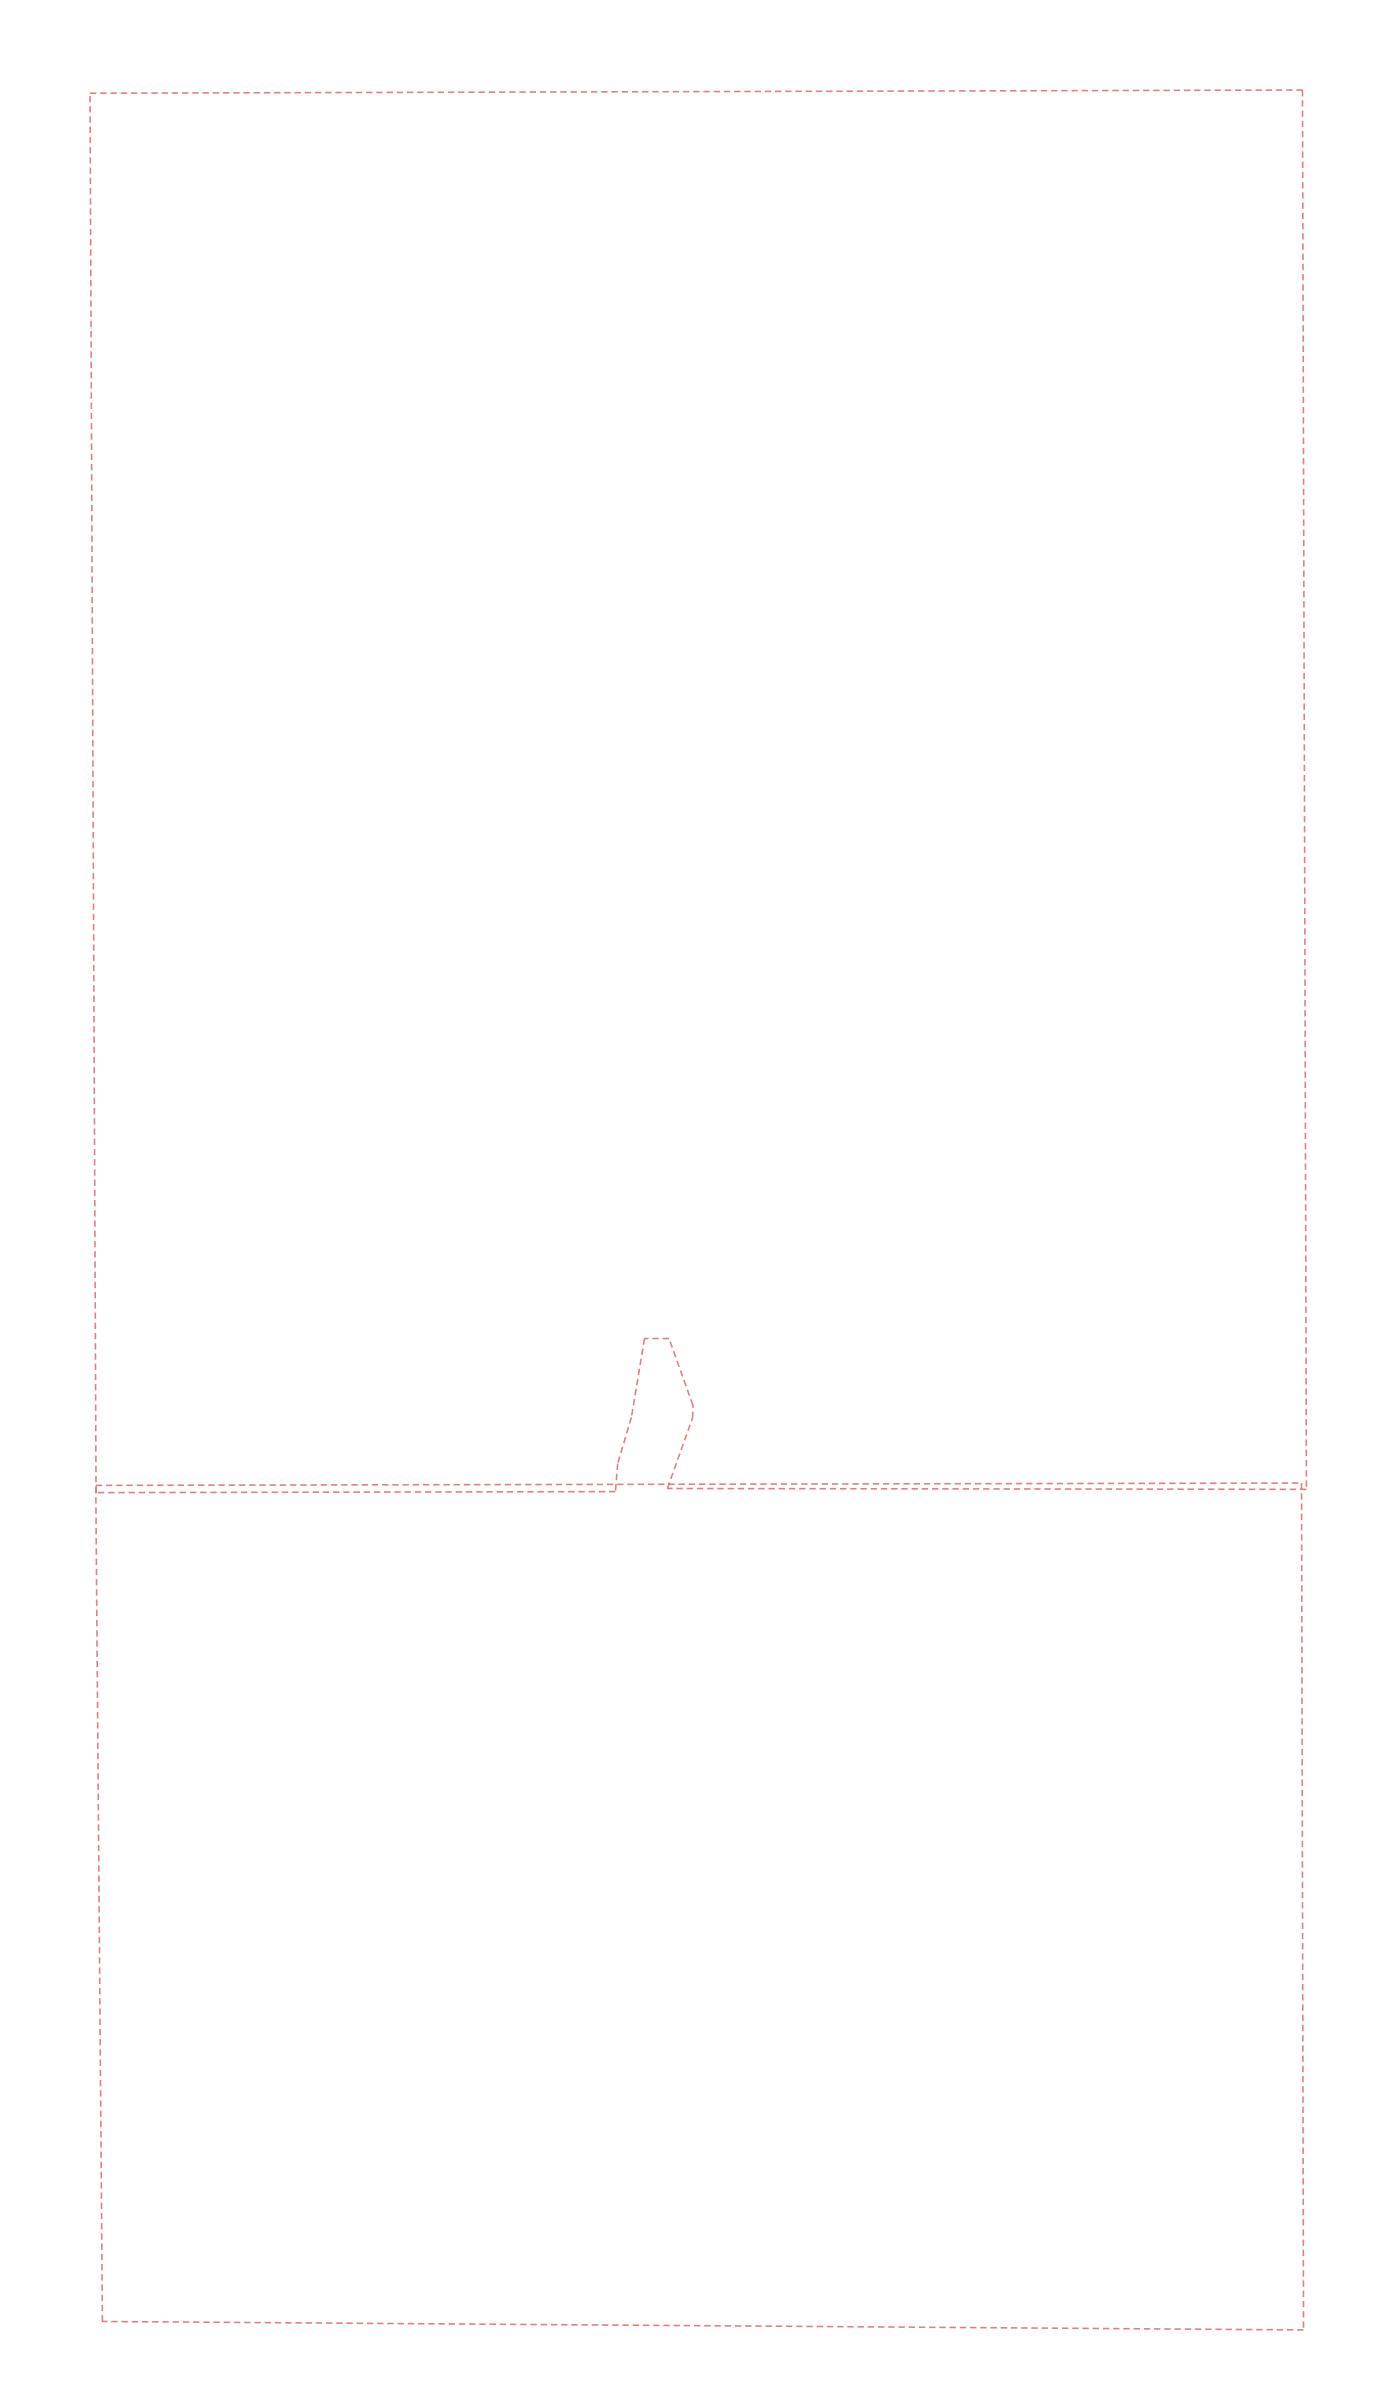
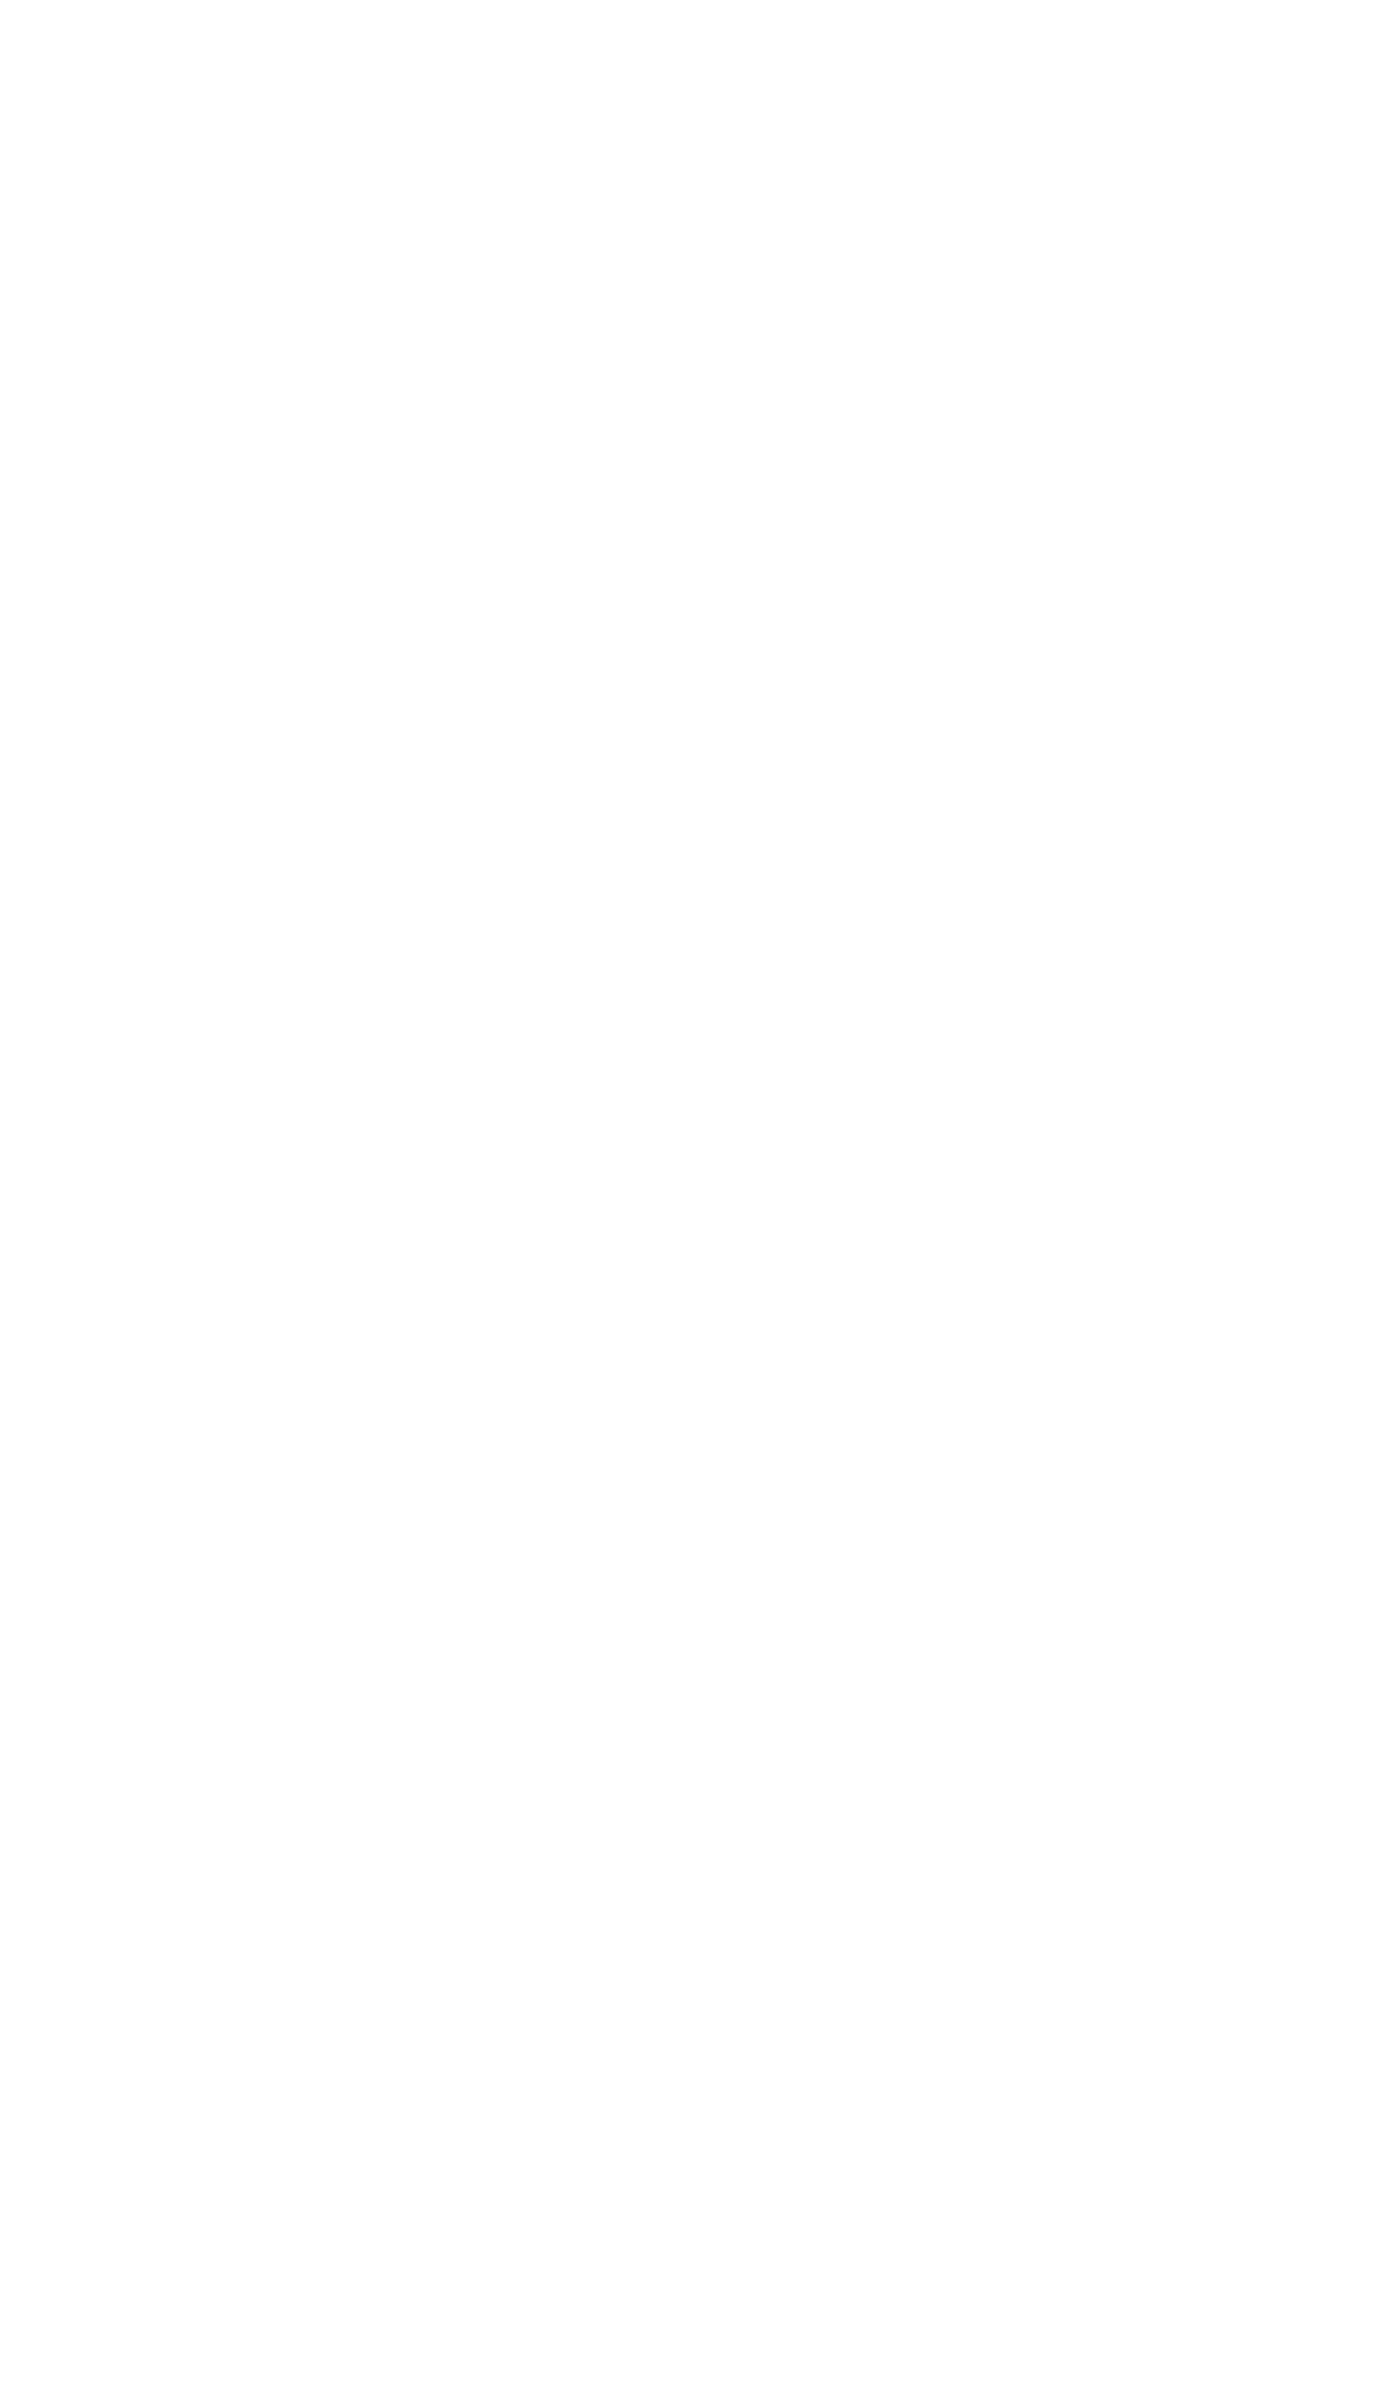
zone outline: (1302, 90) (90, 93) (96, 1492) (615, 1491) (617, 1463) (631, 1417) (644, 1338) (668, 1338) (693, 1405) (692, 1417) (667, 1488) (1306, 1489) (1302, 90) -> none
zone outline: (1301, 1483) (95, 1485) (102, 2321) (1303, 2329) (1301, 1483) -> none

